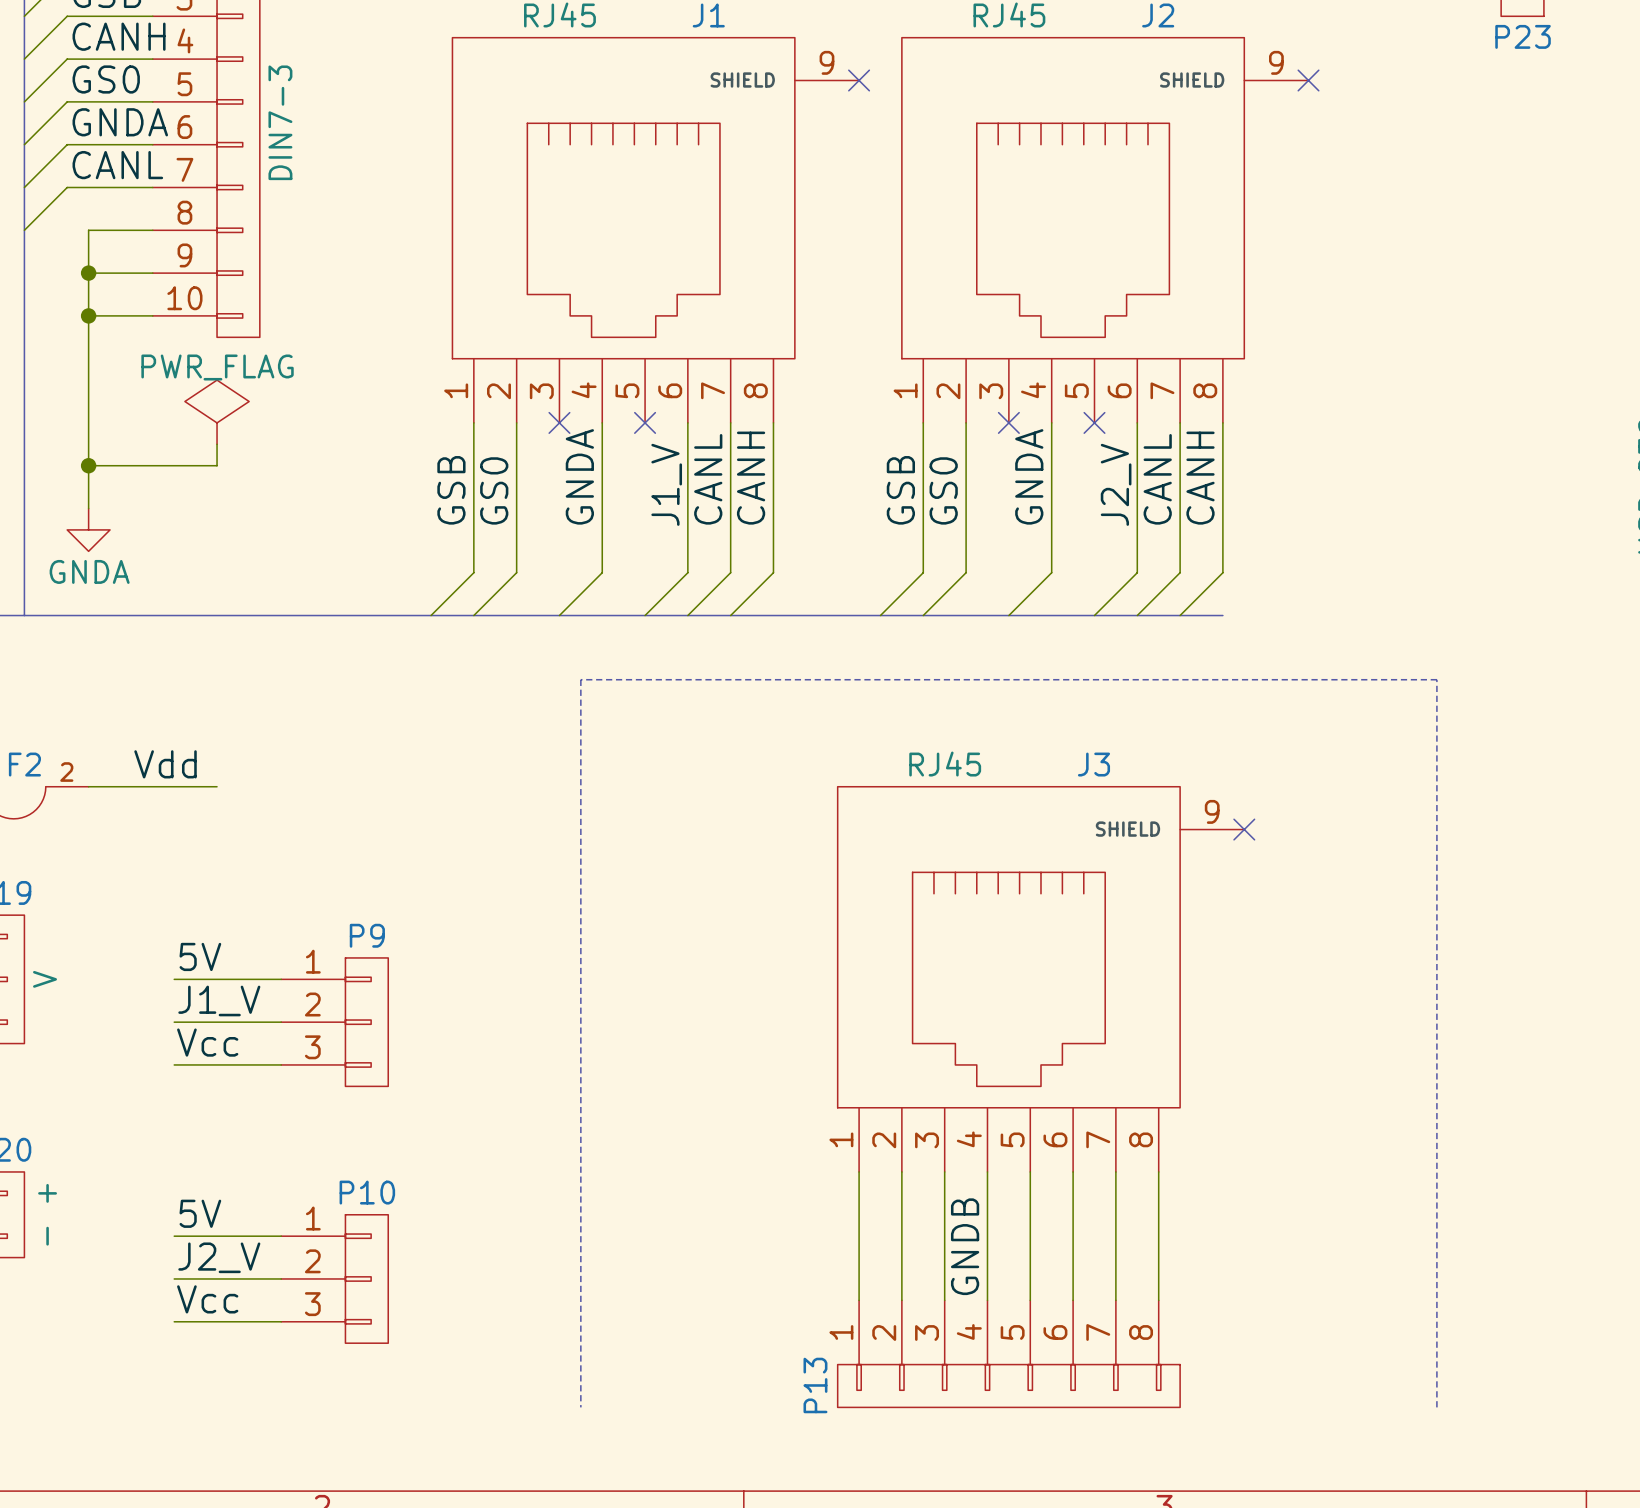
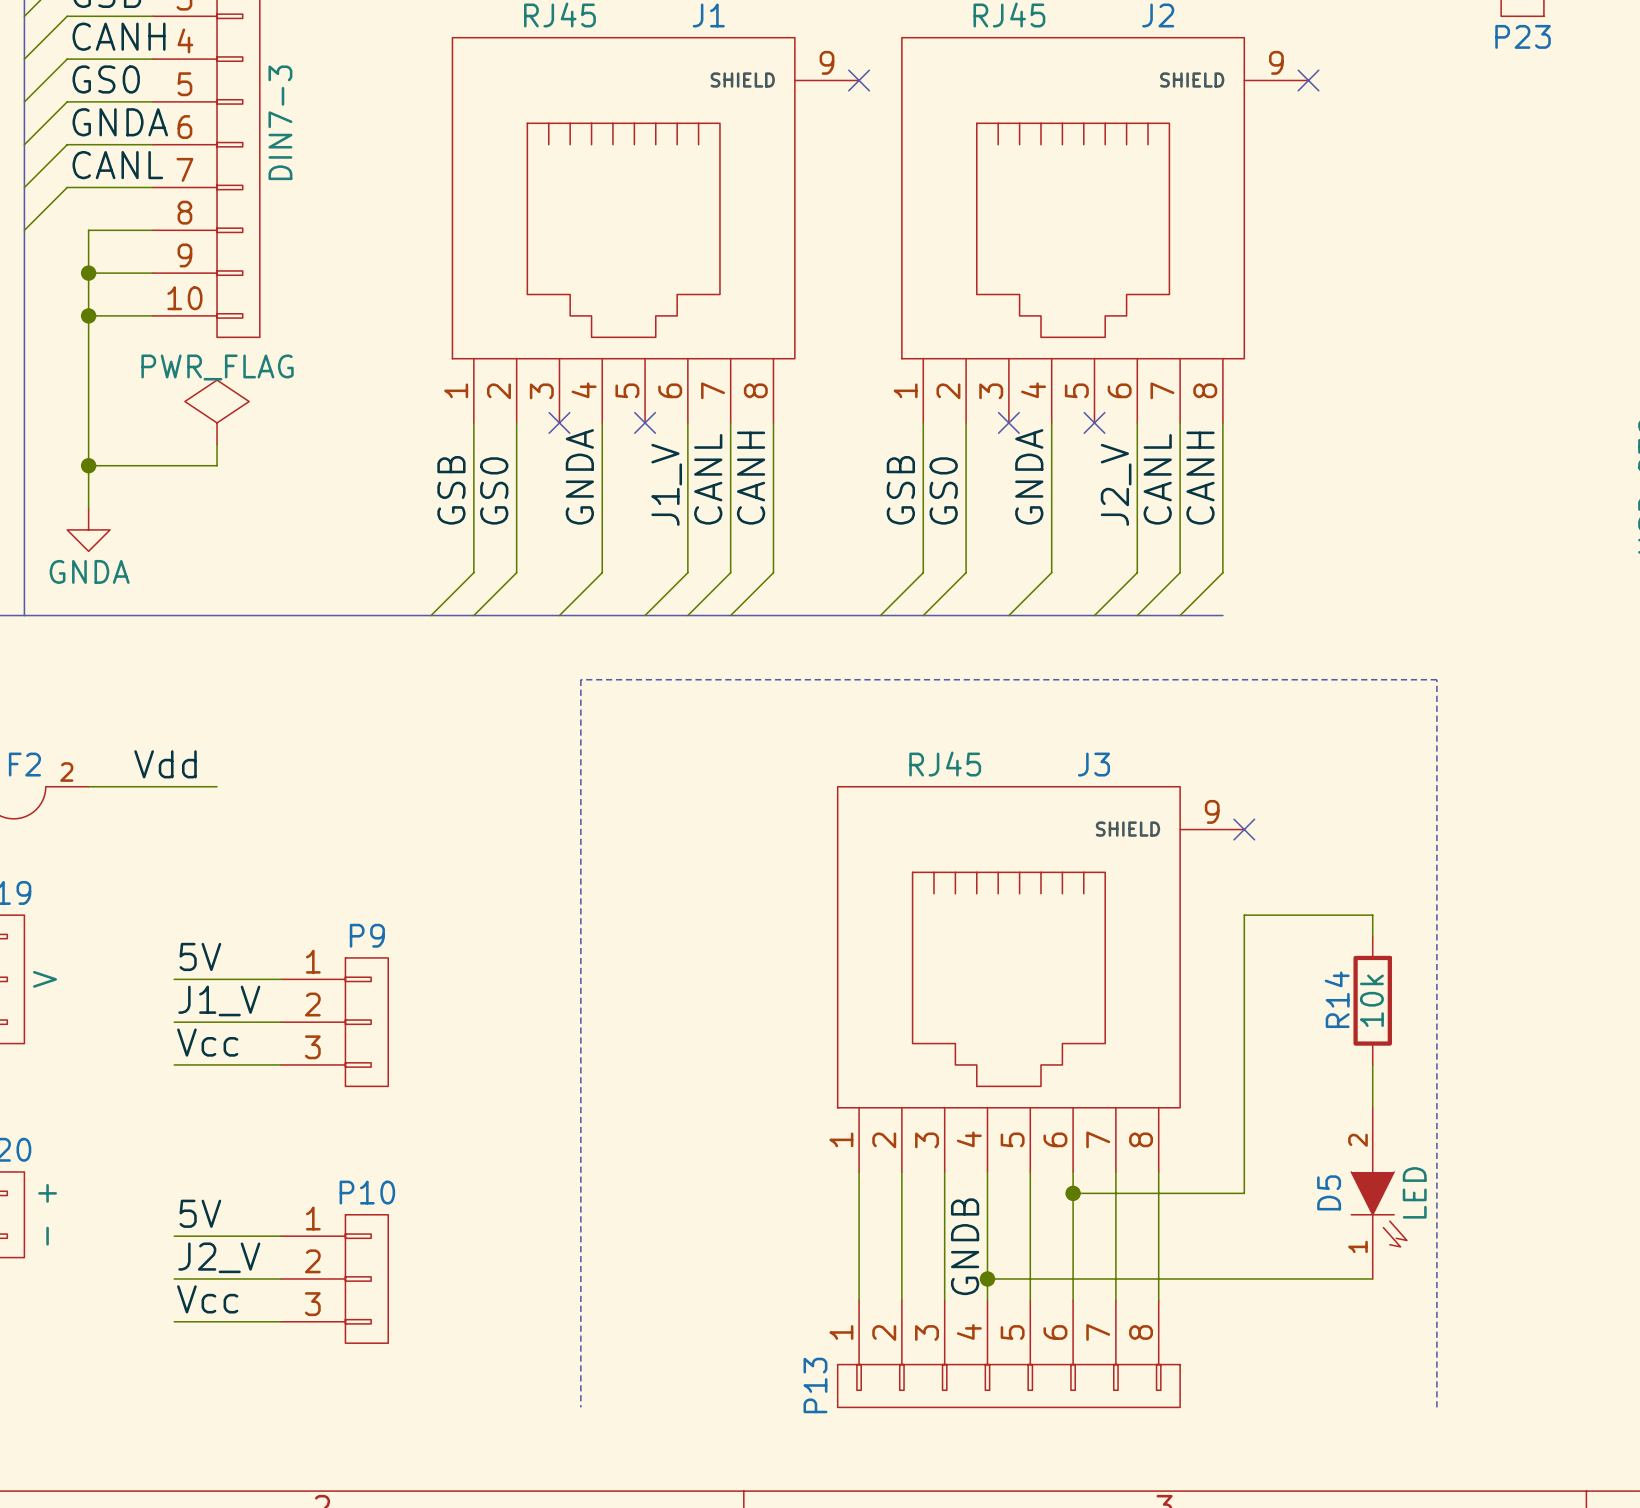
wire: none -> (1372, 936) (1372, 915) (1244, 915) (1244, 1193) (1073, 1193)
R14: none -> 10k (1372, 1000)
wire: none -> (1372, 1064) (1372, 1107)
junction: none -> (1073, 1193)
D5: none -> LED (1379, 1193)
wire: none -> (987, 1278) (1372, 1278)
junction: none -> (987, 1278)

